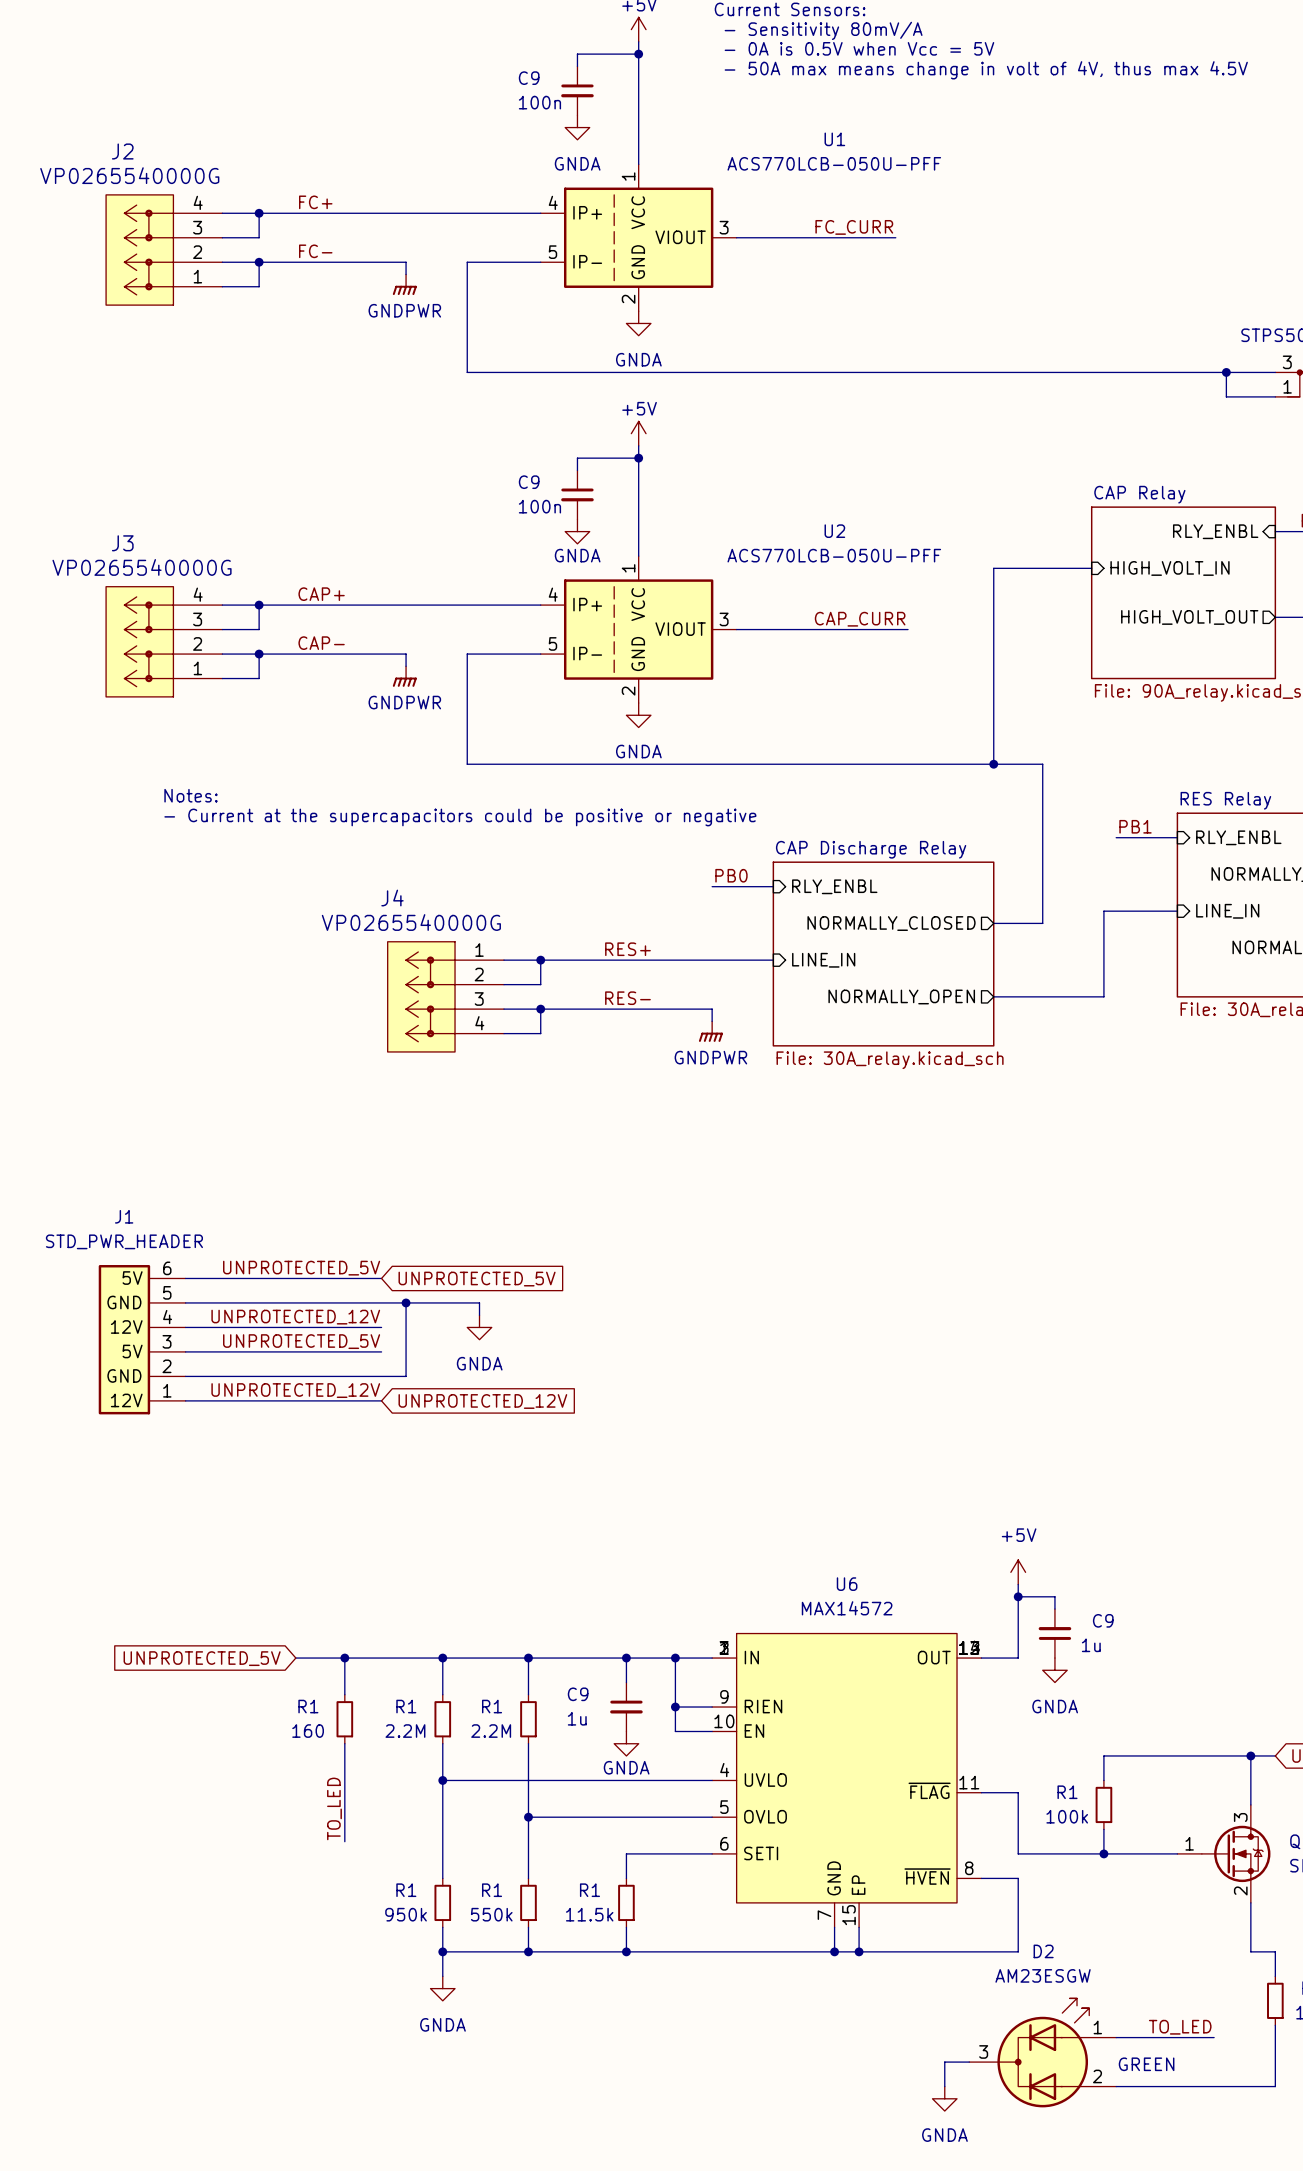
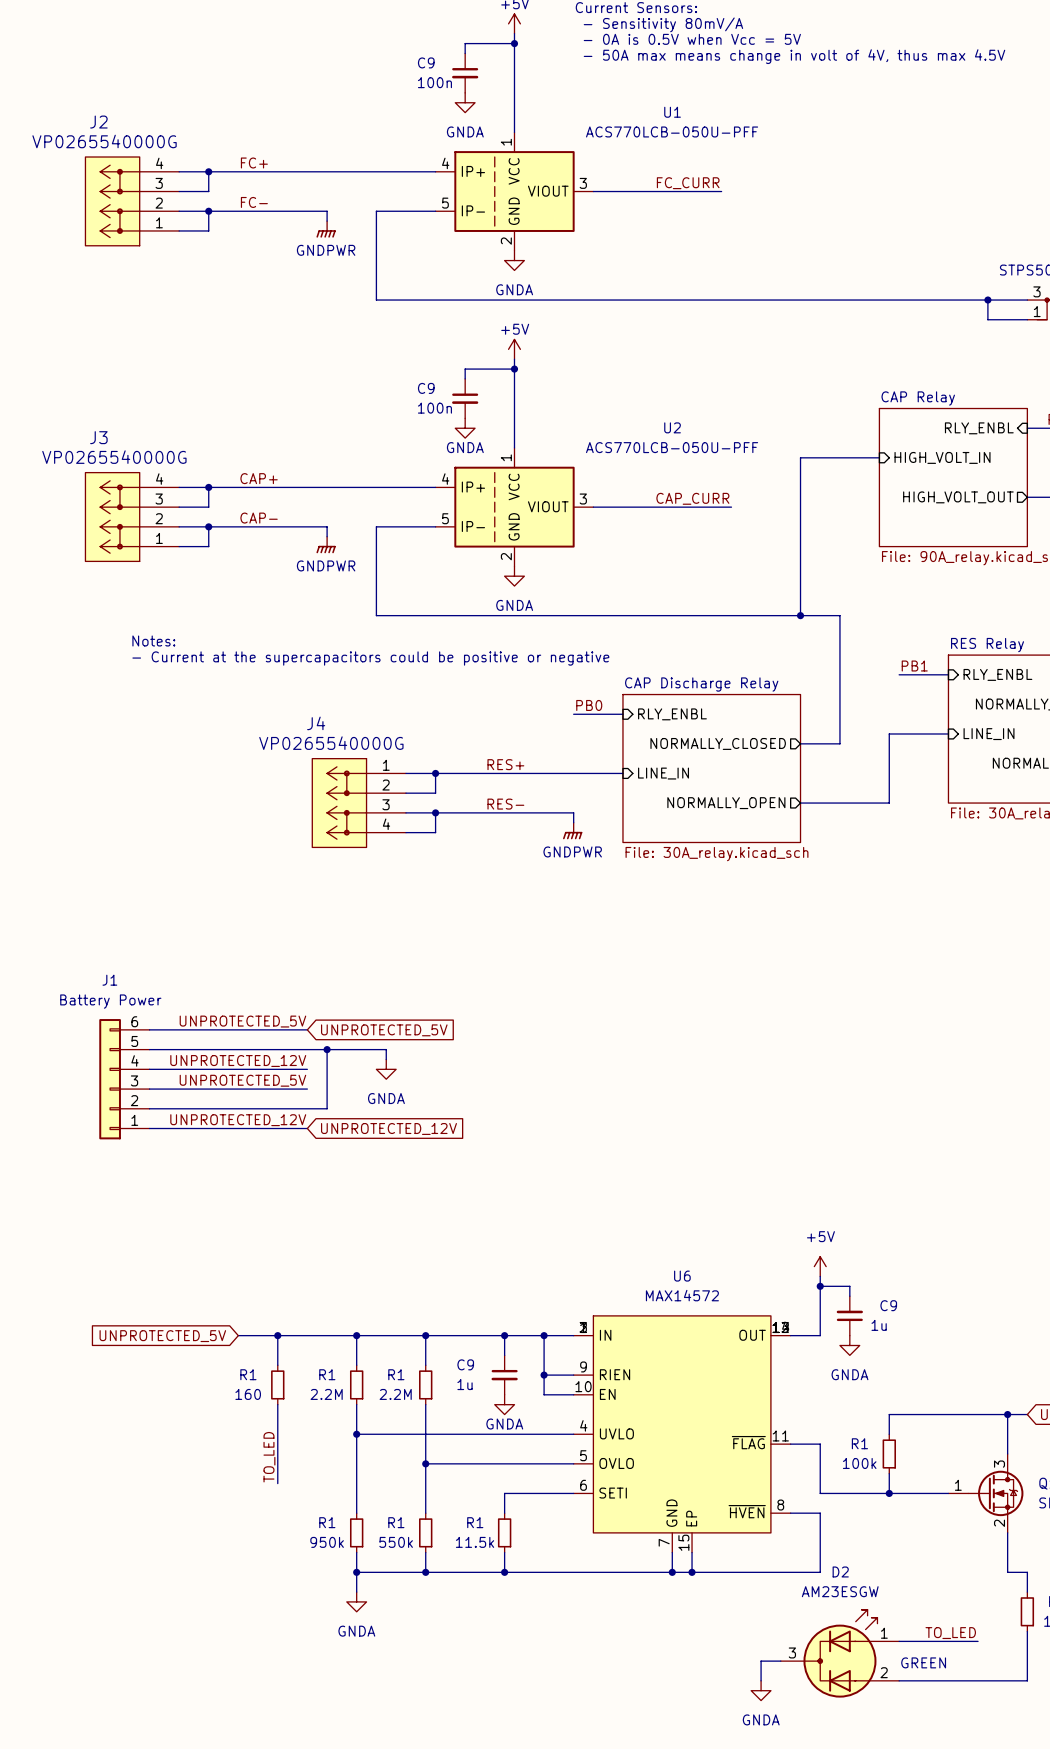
J1 value: STD_PWR_HEADER (124, 1241) -> Battery Power (110, 1001)
J1 symbol: [98, 1265, 186, 1415] -> [99, 1019, 150, 1140]

